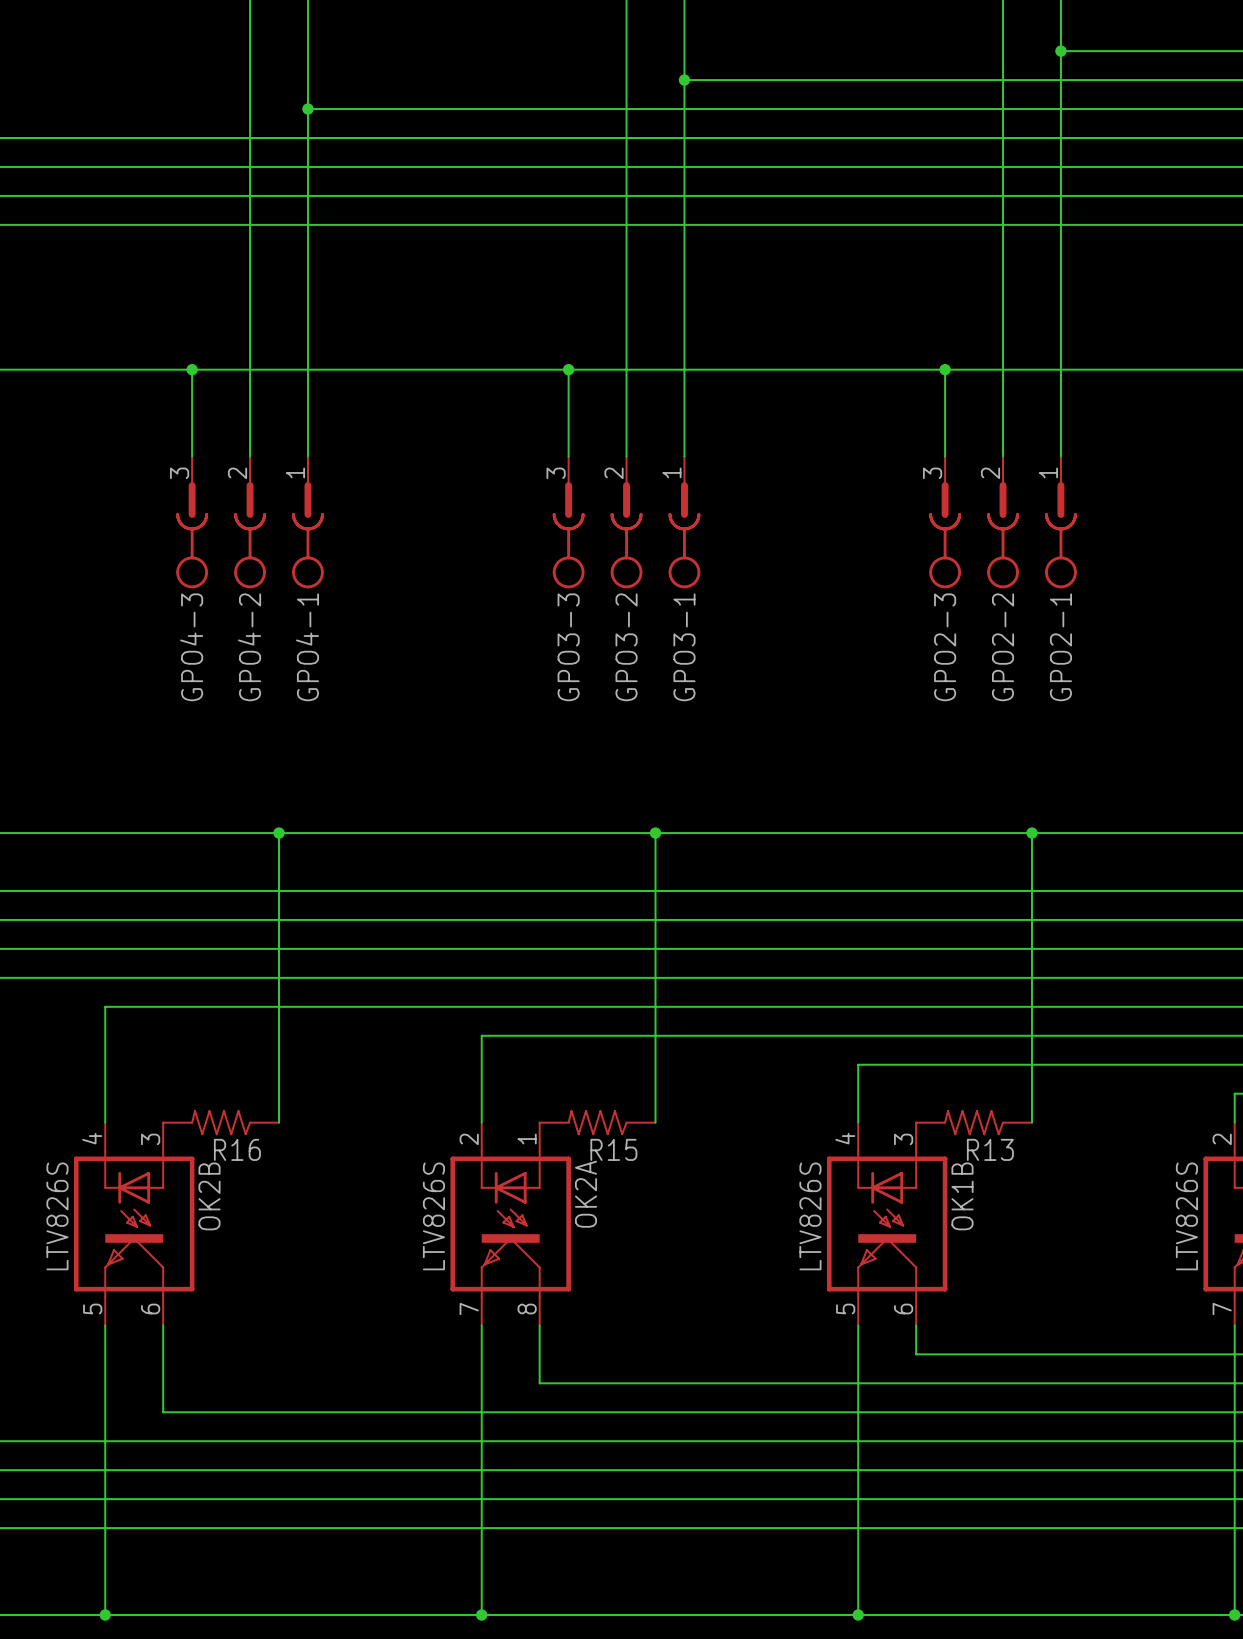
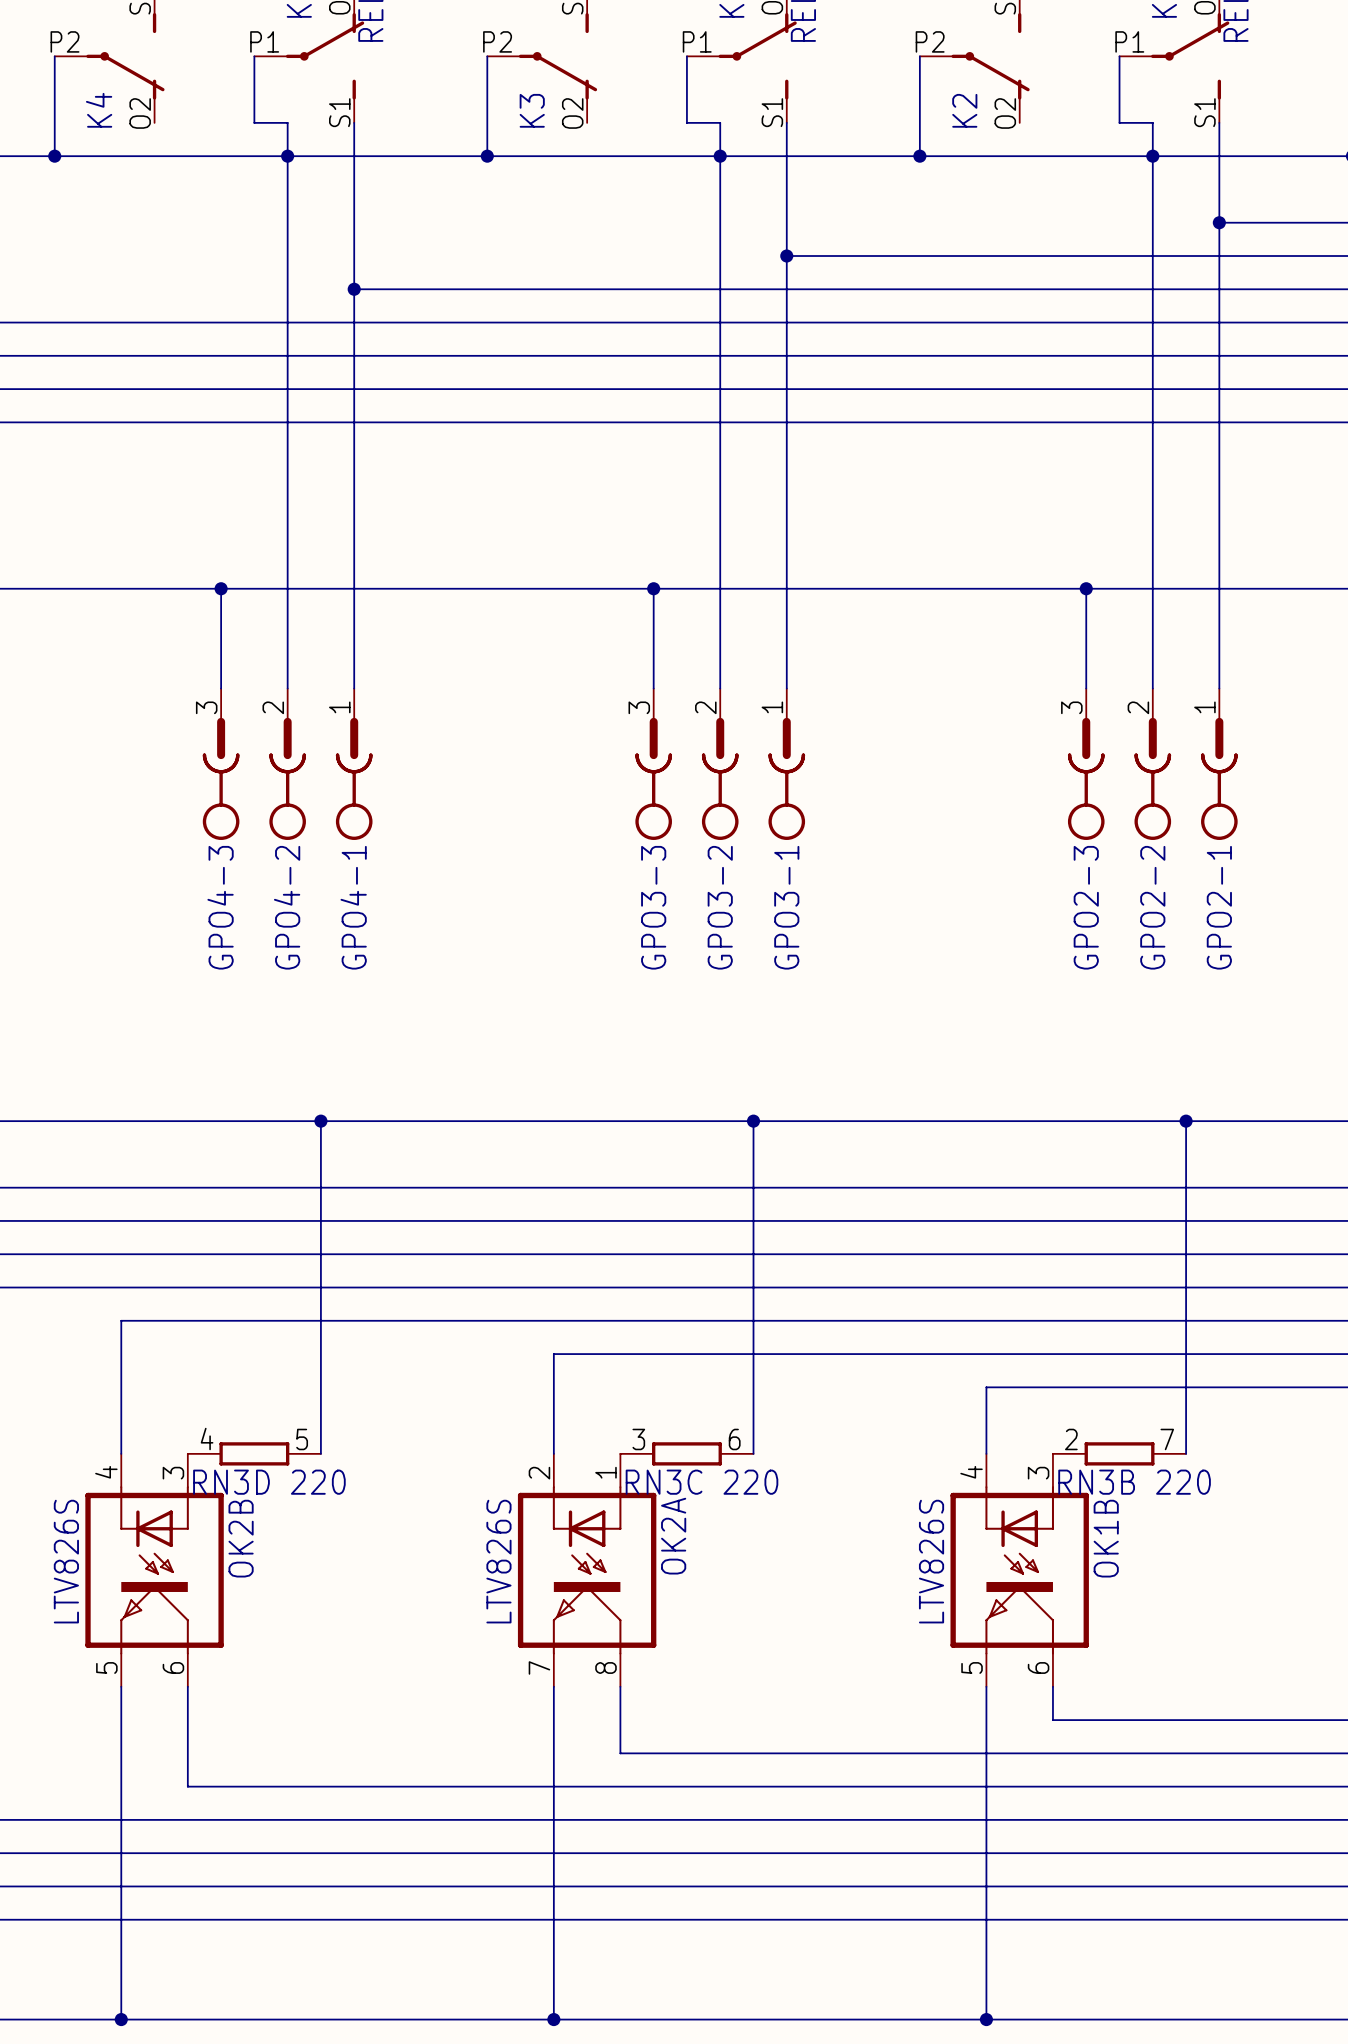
R16: (221, 1122) -> none
RN3D: none -> 220 (254, 1453)
R15: (597, 1122) -> none
RN3C: none -> 220 (686, 1453)
R13: (974, 1122) -> none
RN3B: none -> 220 (1119, 1453)

